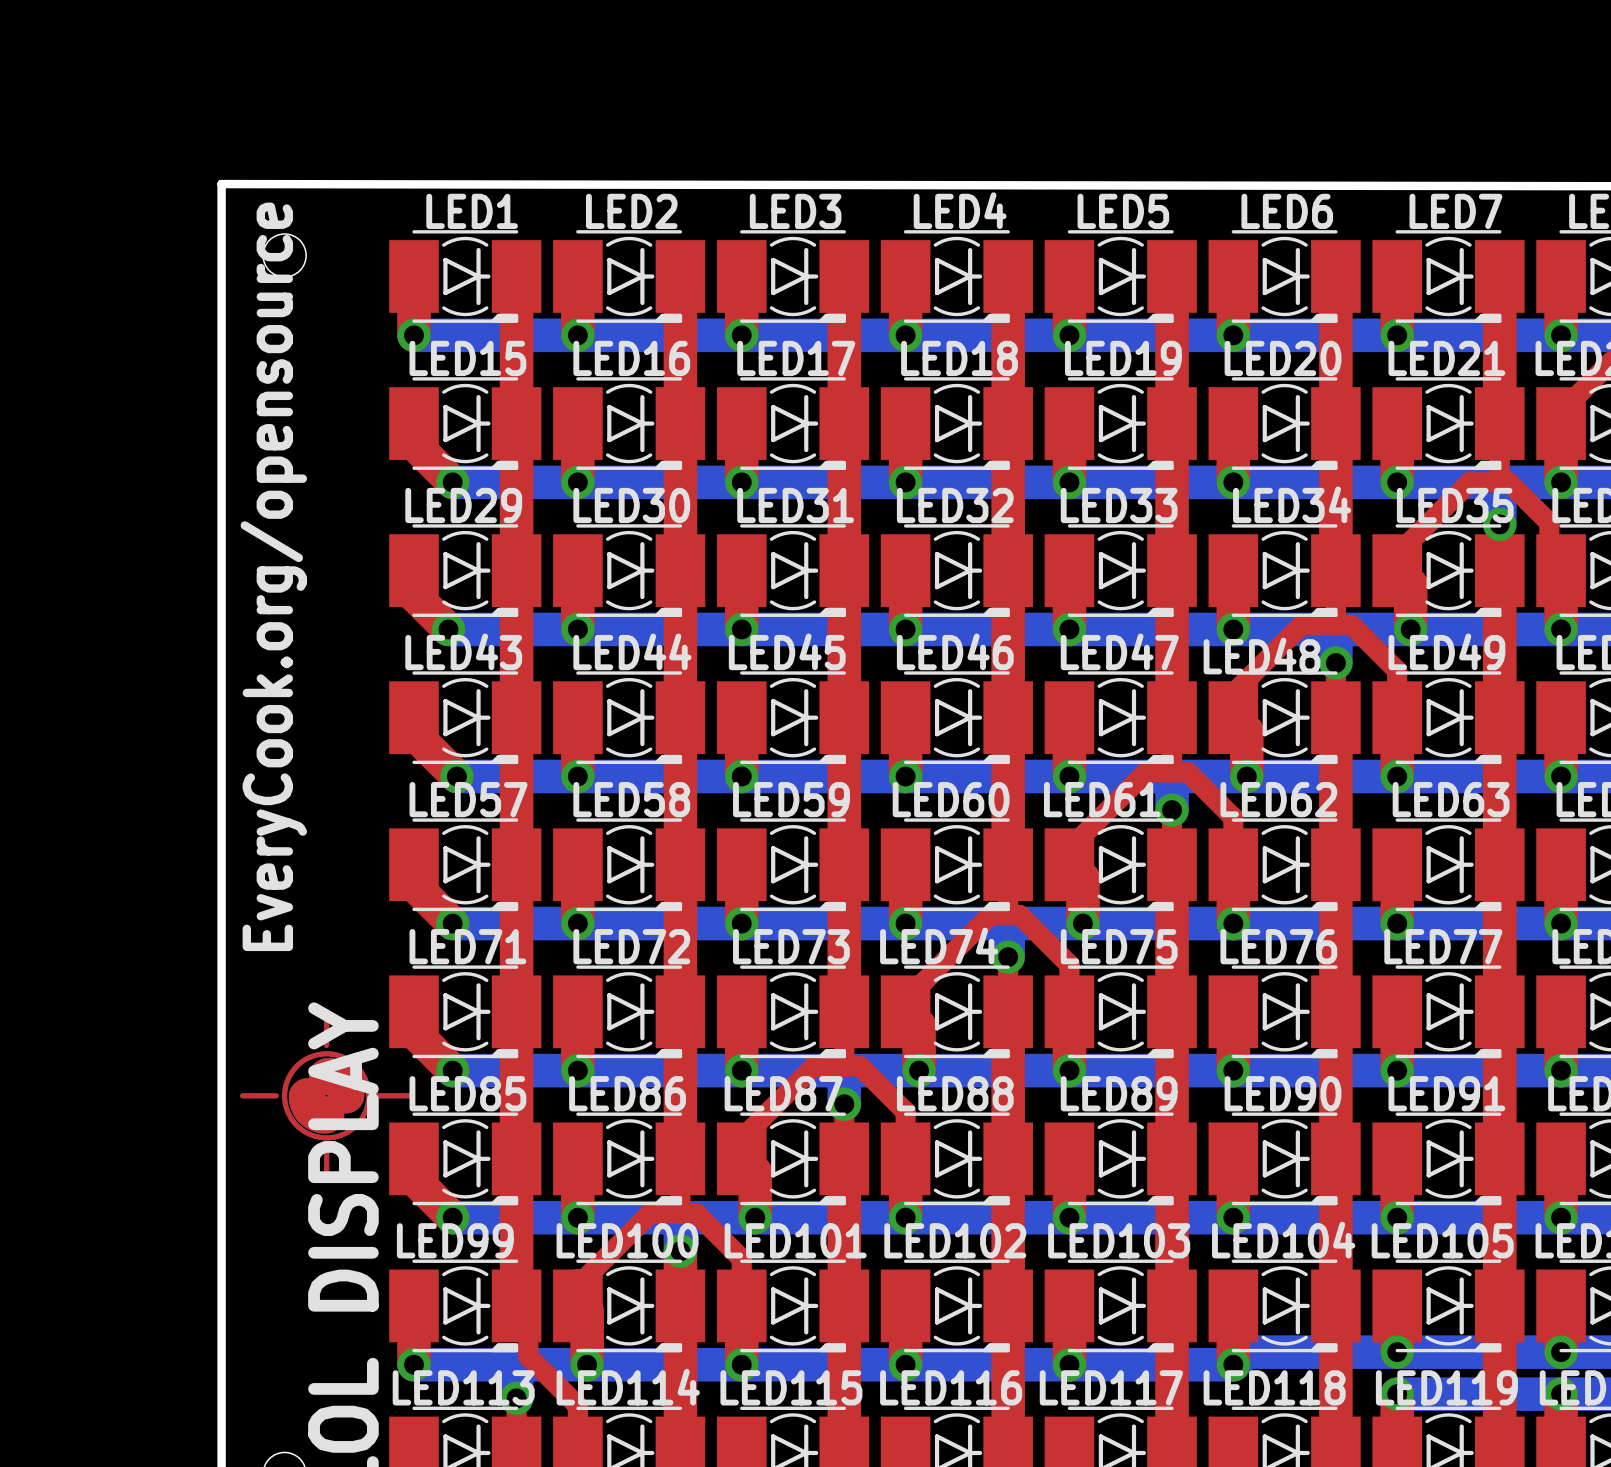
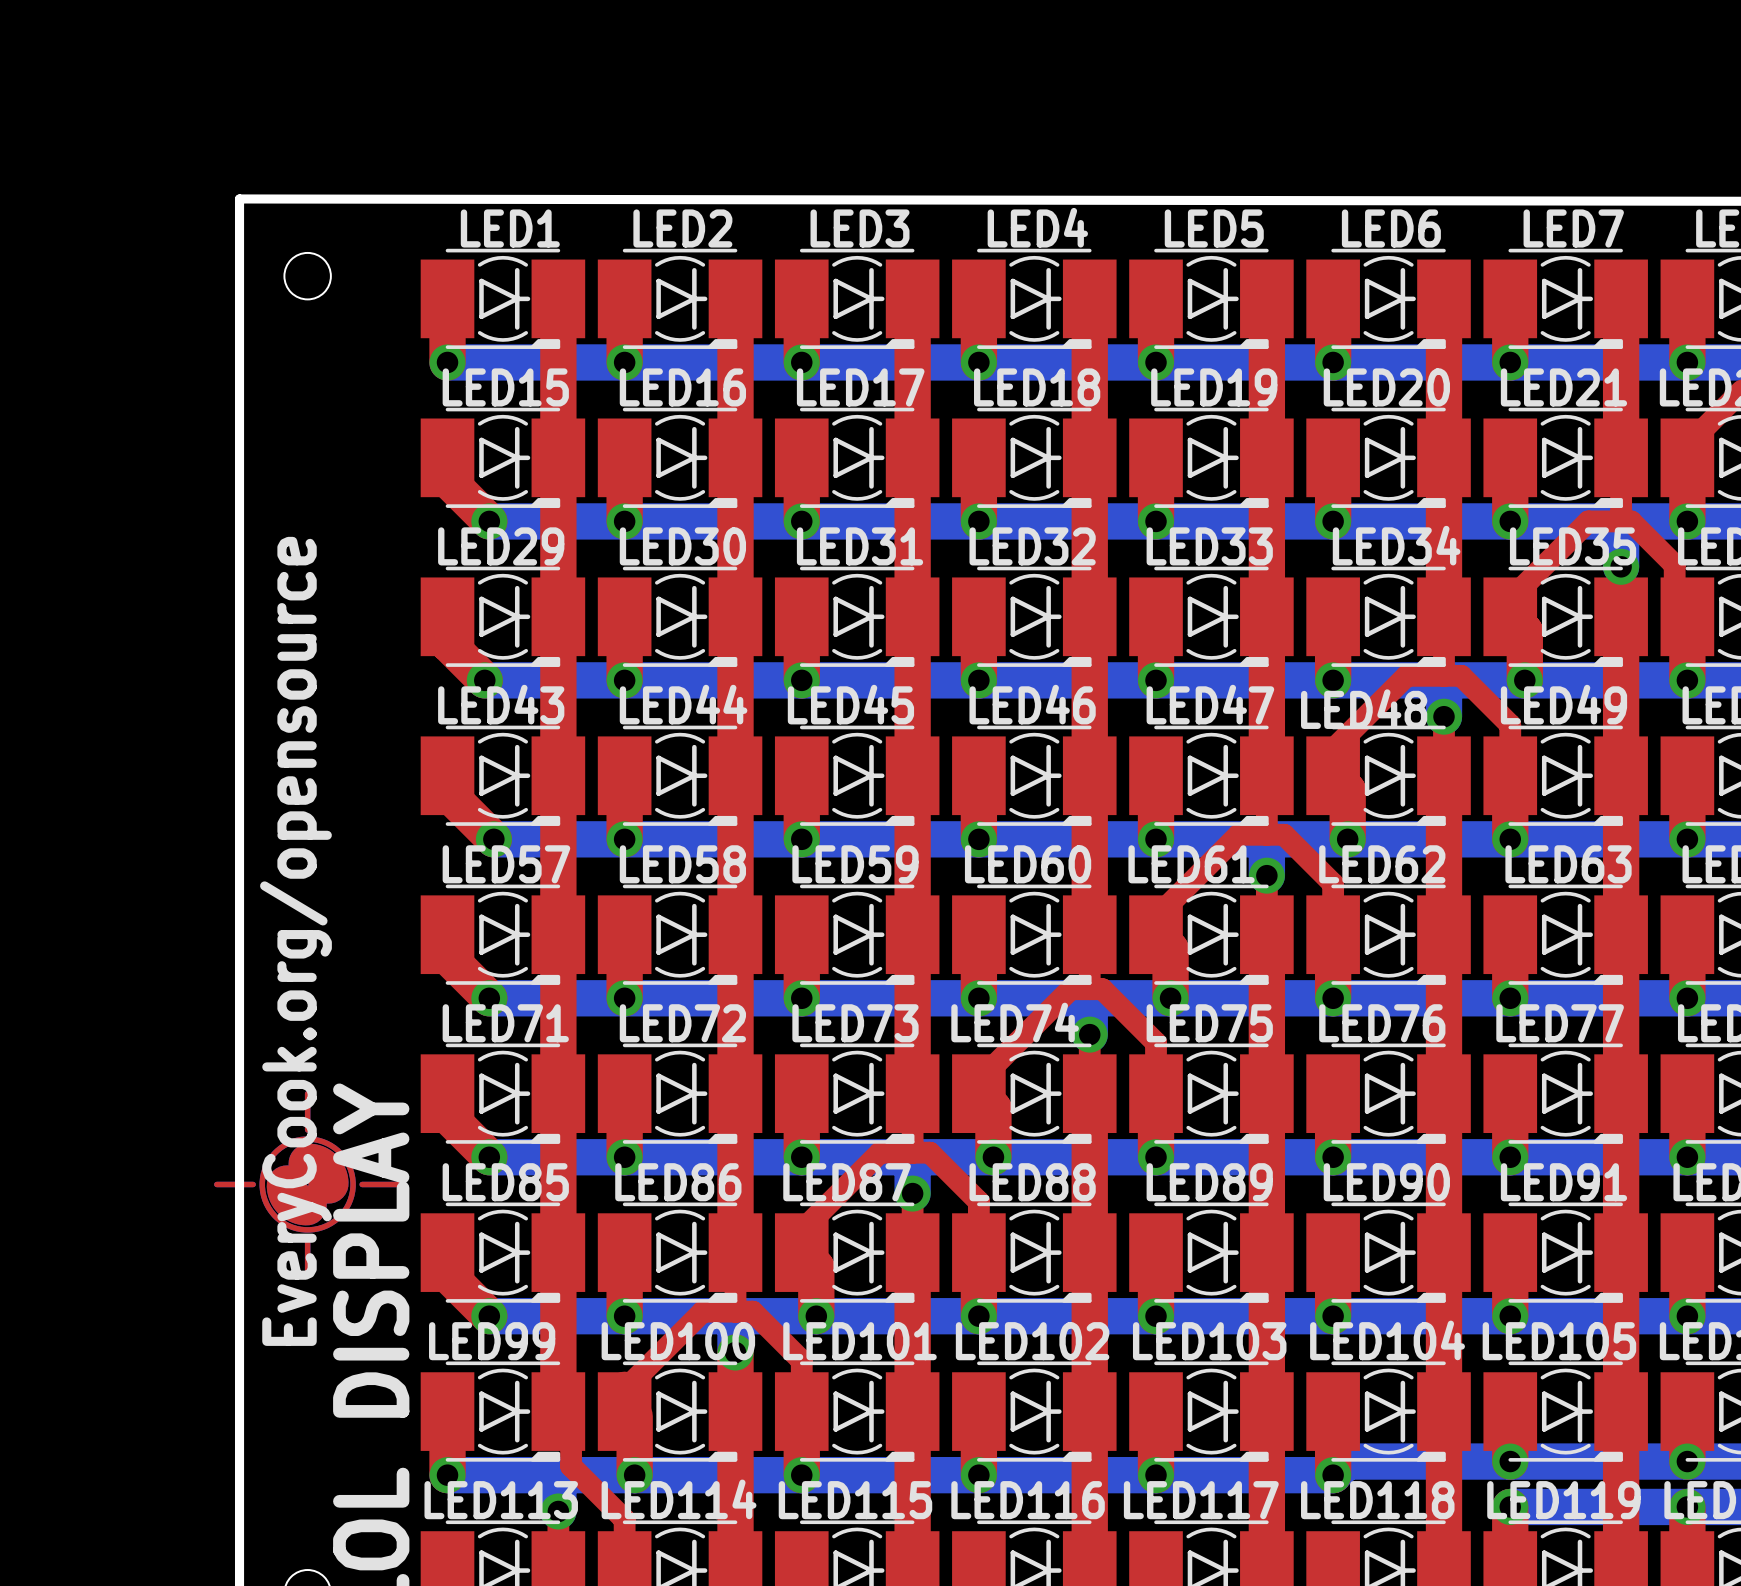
text position: EveryCook.org/opensource (273, 576) -> EveryCook.org/opensource (295, 941)
drawing position: (326, 1095) -> (307, 1184)

